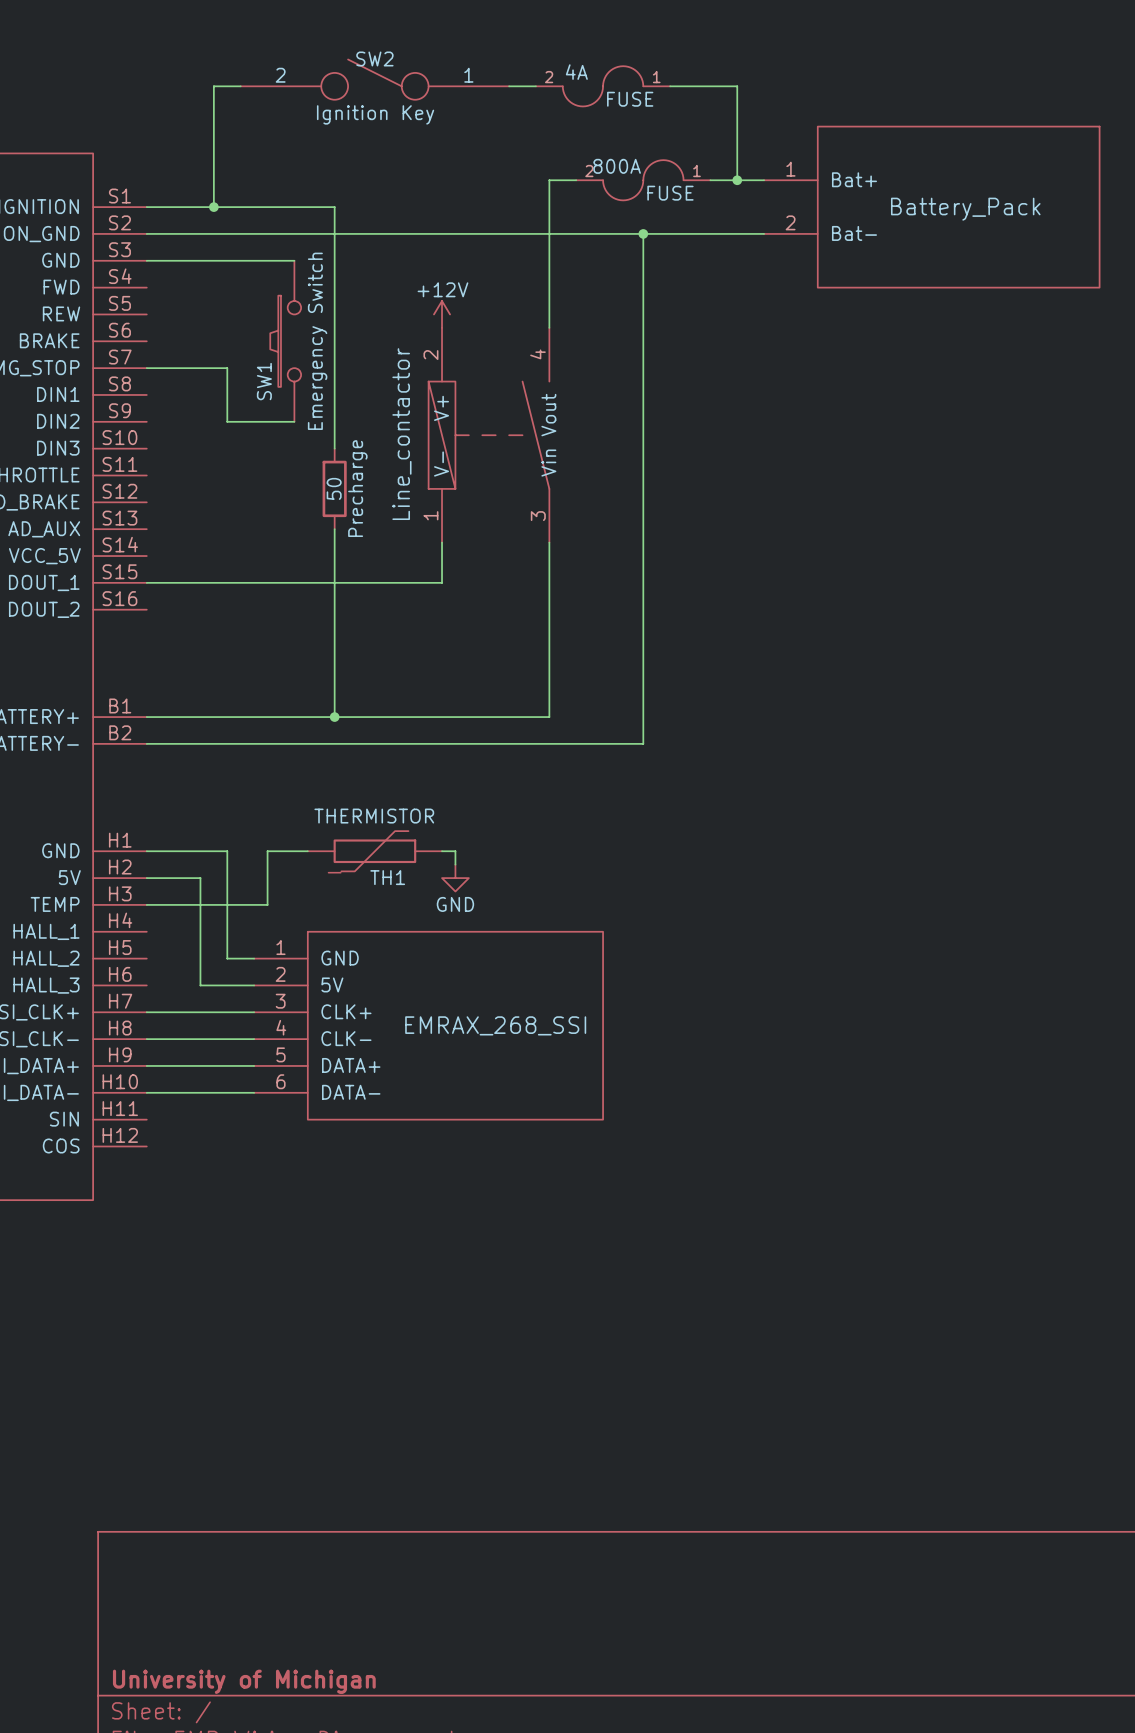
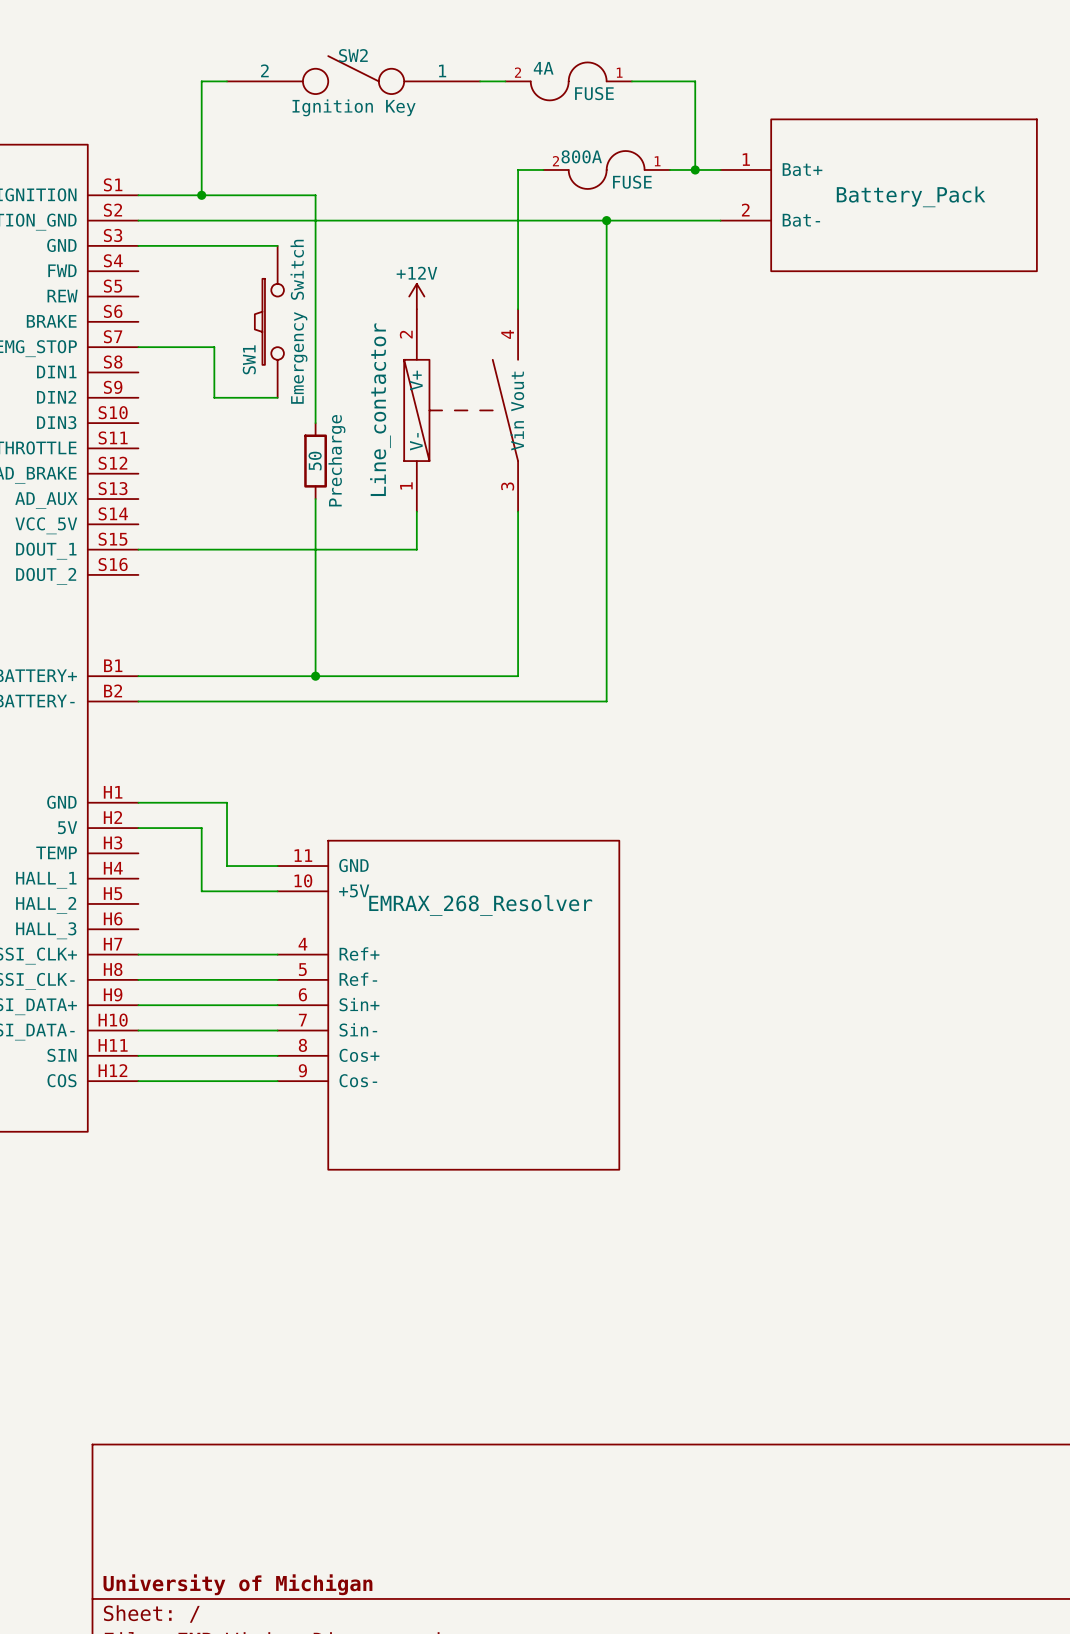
wire: (227, 851) (227, 958) (254, 958) -> (214, 802) (227, 802) (227, 866) (277, 866)
wire: (307, 851) (267, 851) (267, 904) (146, 904) -> none
TH1: THERMISTOR (374, 851) -> none
wire: (442, 851) (455, 851) (455, 864) -> none
wire: (200, 878) (200, 985) (254, 985) -> (189, 828) (201, 828) (201, 891) (277, 891)
power symbol: GND (455, 878) -> none
part: EMRAX_268_SSI (428, 1025) -> none
part: none -> EMRAX_268_Resolver (448, 1005)
wire: none -> (138, 1055) (277, 1055)
wire: none -> (138, 1081) (277, 1081)

